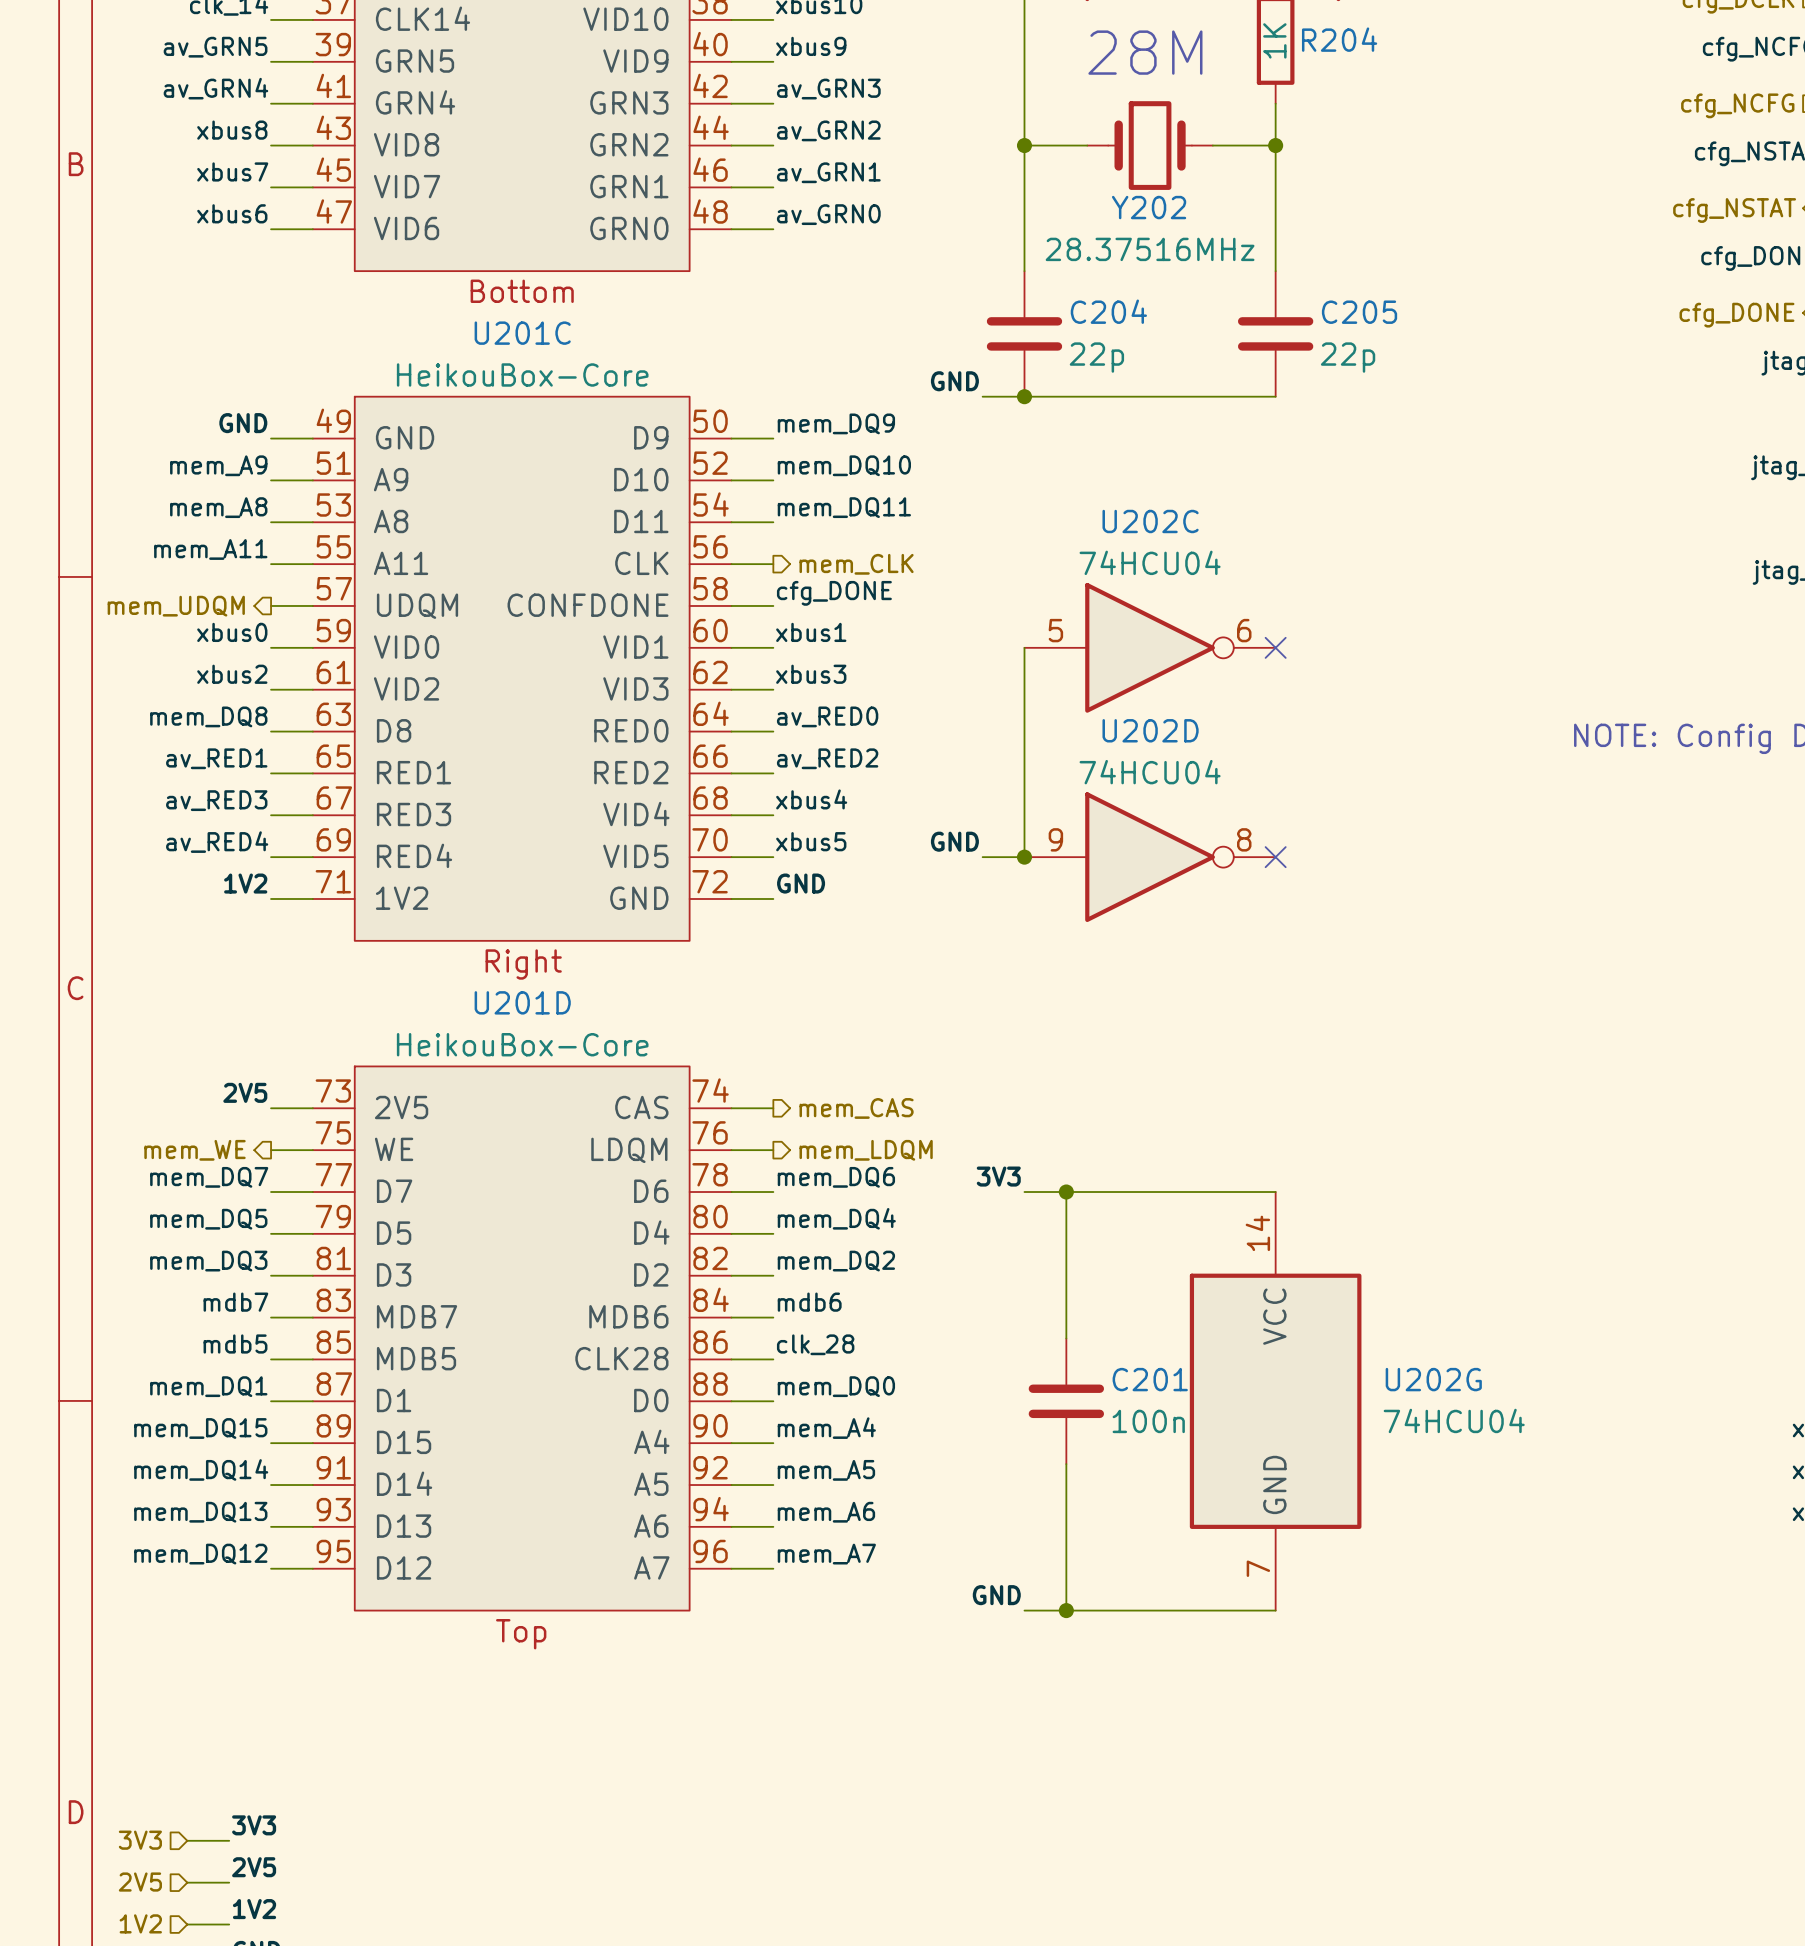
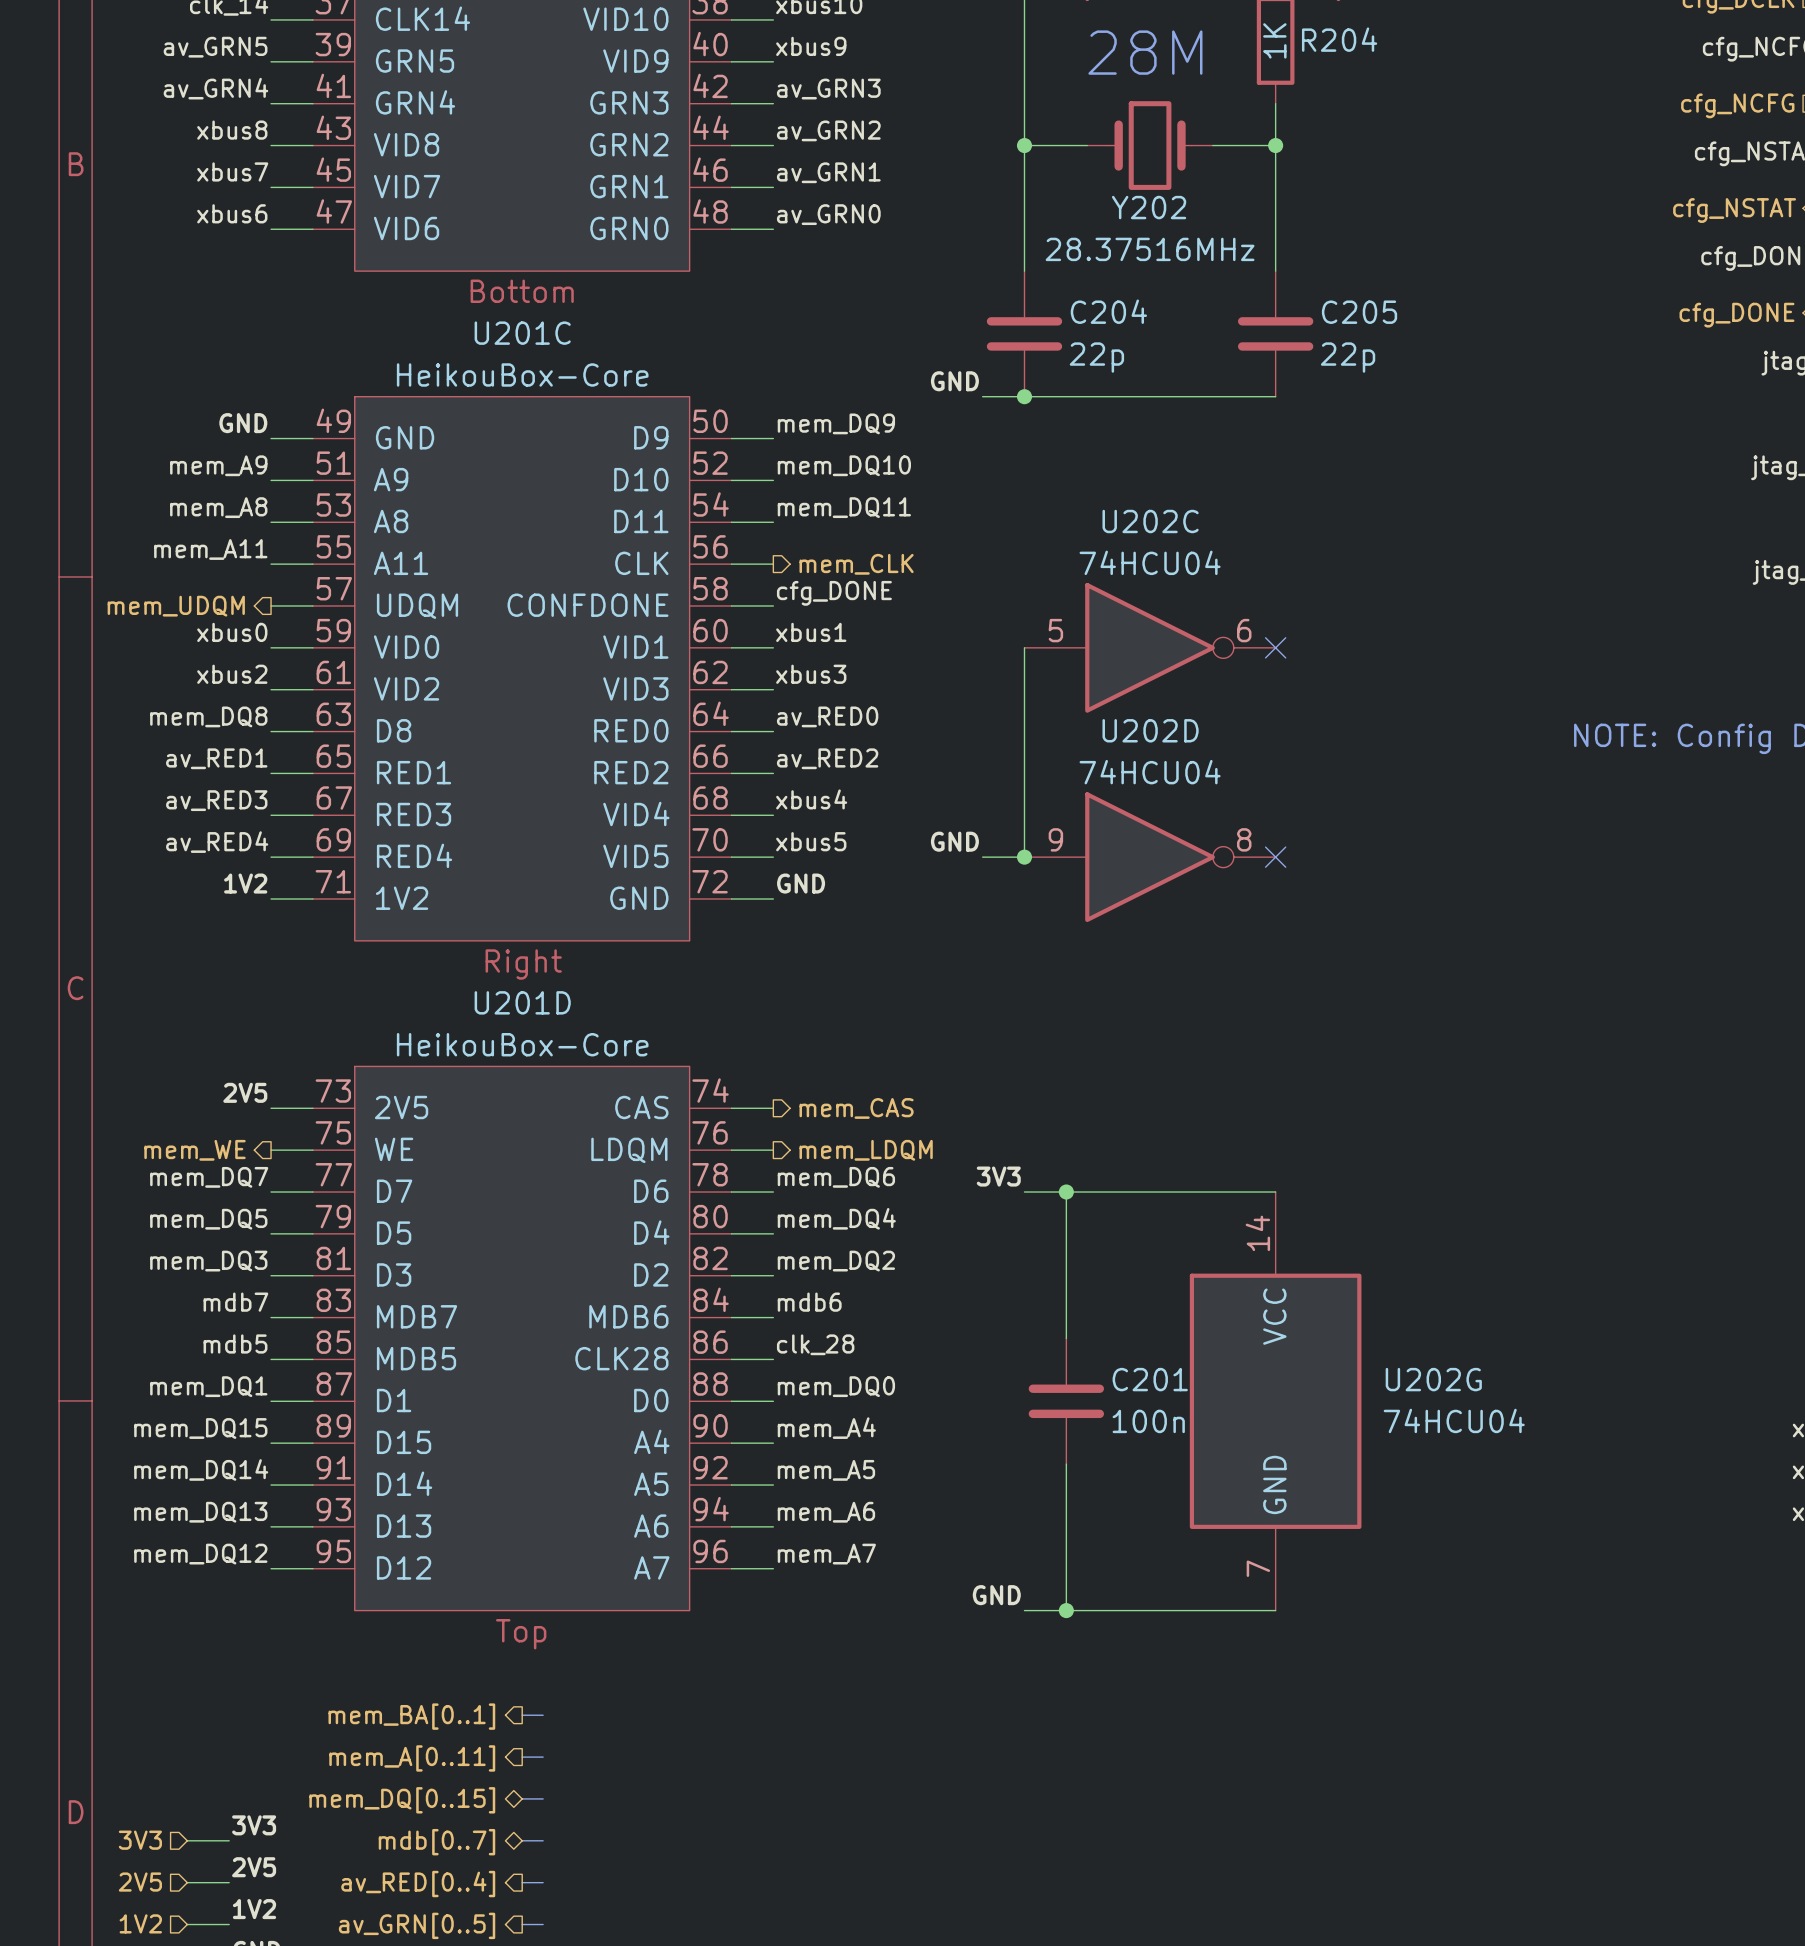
bus: none -> (522, 1715) (543, 1715)
hierarchical label: none -> mem_BA[0..1] (411, 1716)
bus: none -> (522, 1757) (543, 1757)
hierarchical label: none -> mem_A[0..11] (412, 1758)
bus: none -> (522, 1798) (543, 1798)
hierarchical label: none -> mem_DQ[0..15] (402, 1800)
bus: none -> (522, 1840) (543, 1840)
hierarchical label: none -> mdb[0..7] (436, 1842)
bus: none -> (522, 1882) (543, 1882)
hierarchical label: none -> av_RED[0..4] (418, 1884)
bus: none -> (522, 1924) (543, 1924)
hierarchical label: none -> av_GRN[0..5] (417, 1925)

